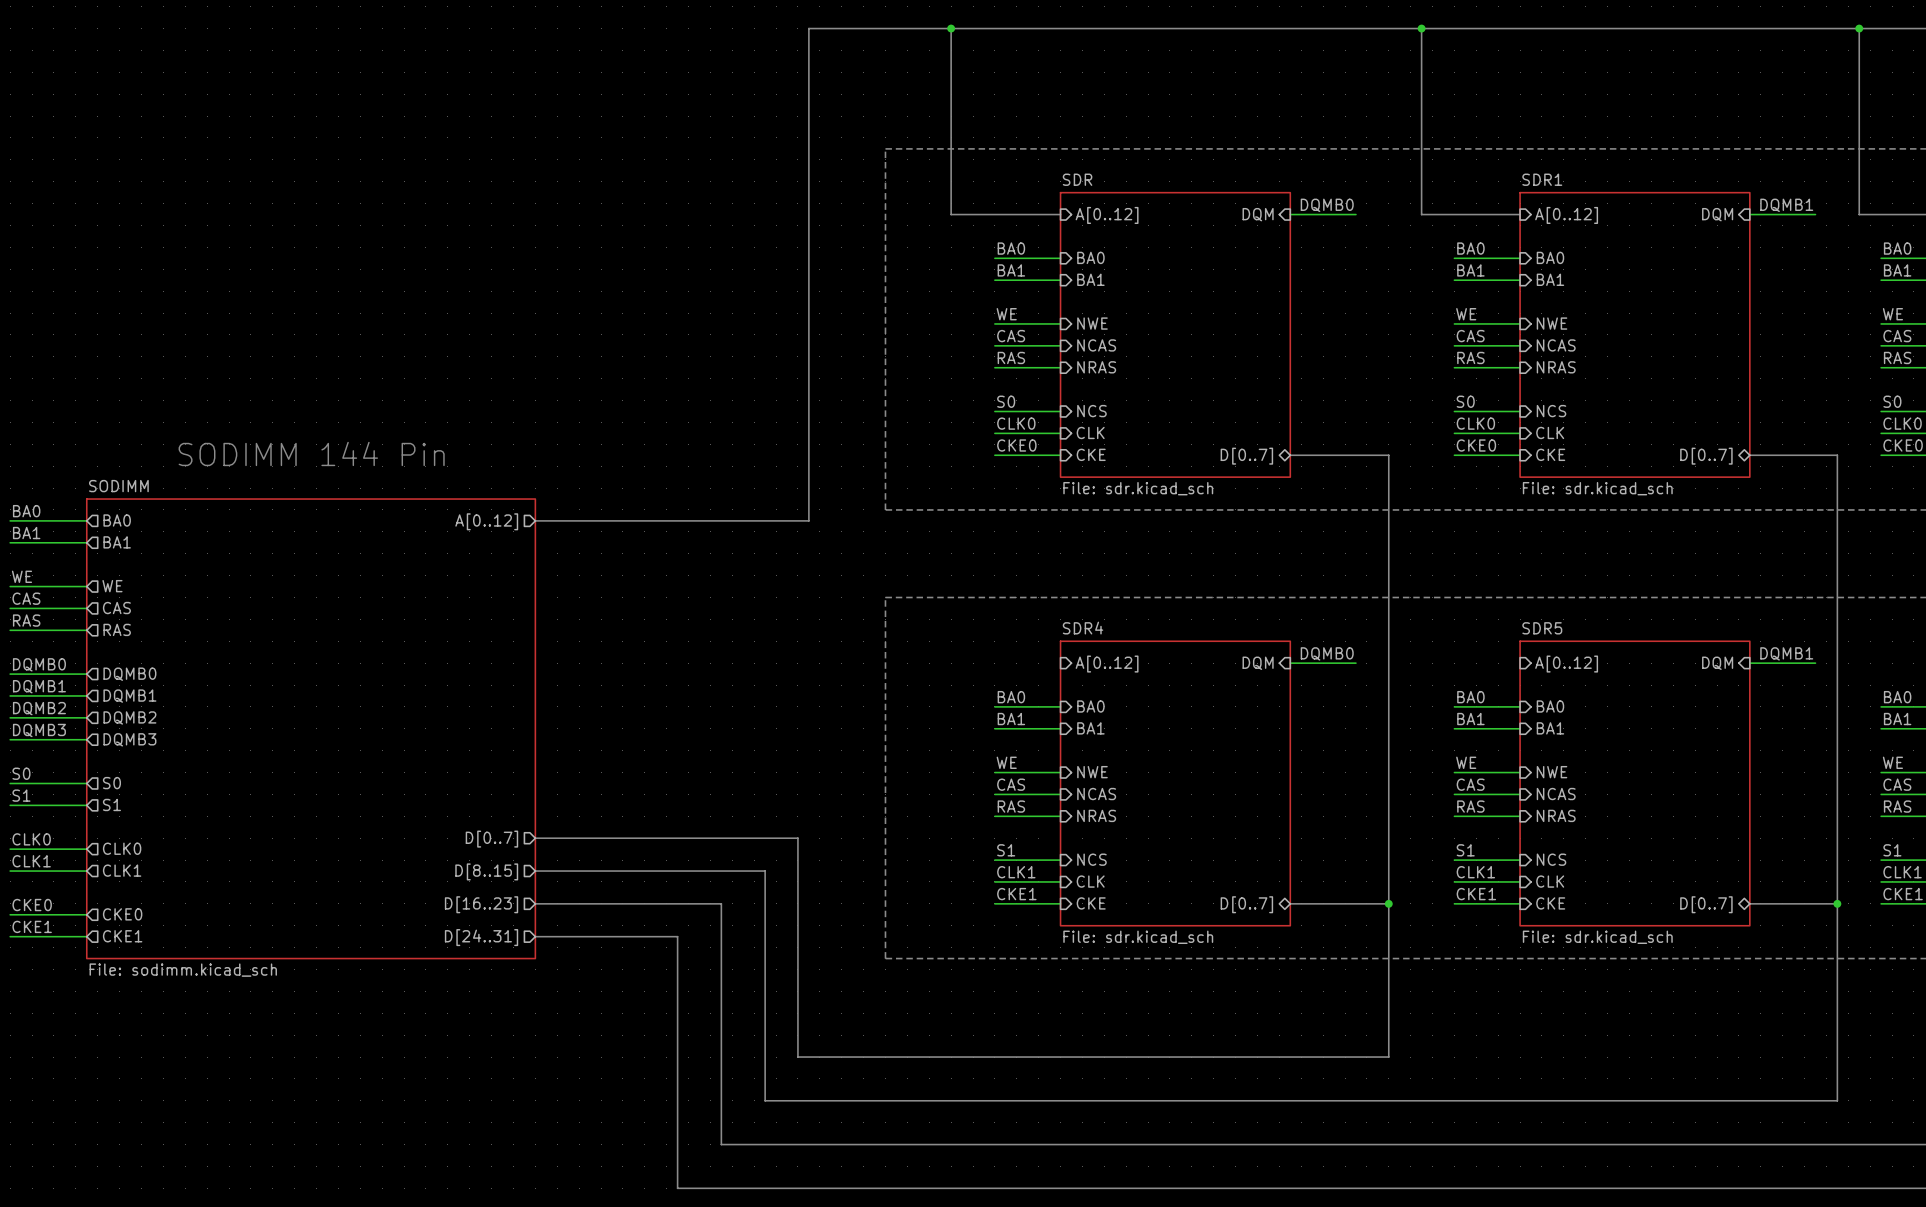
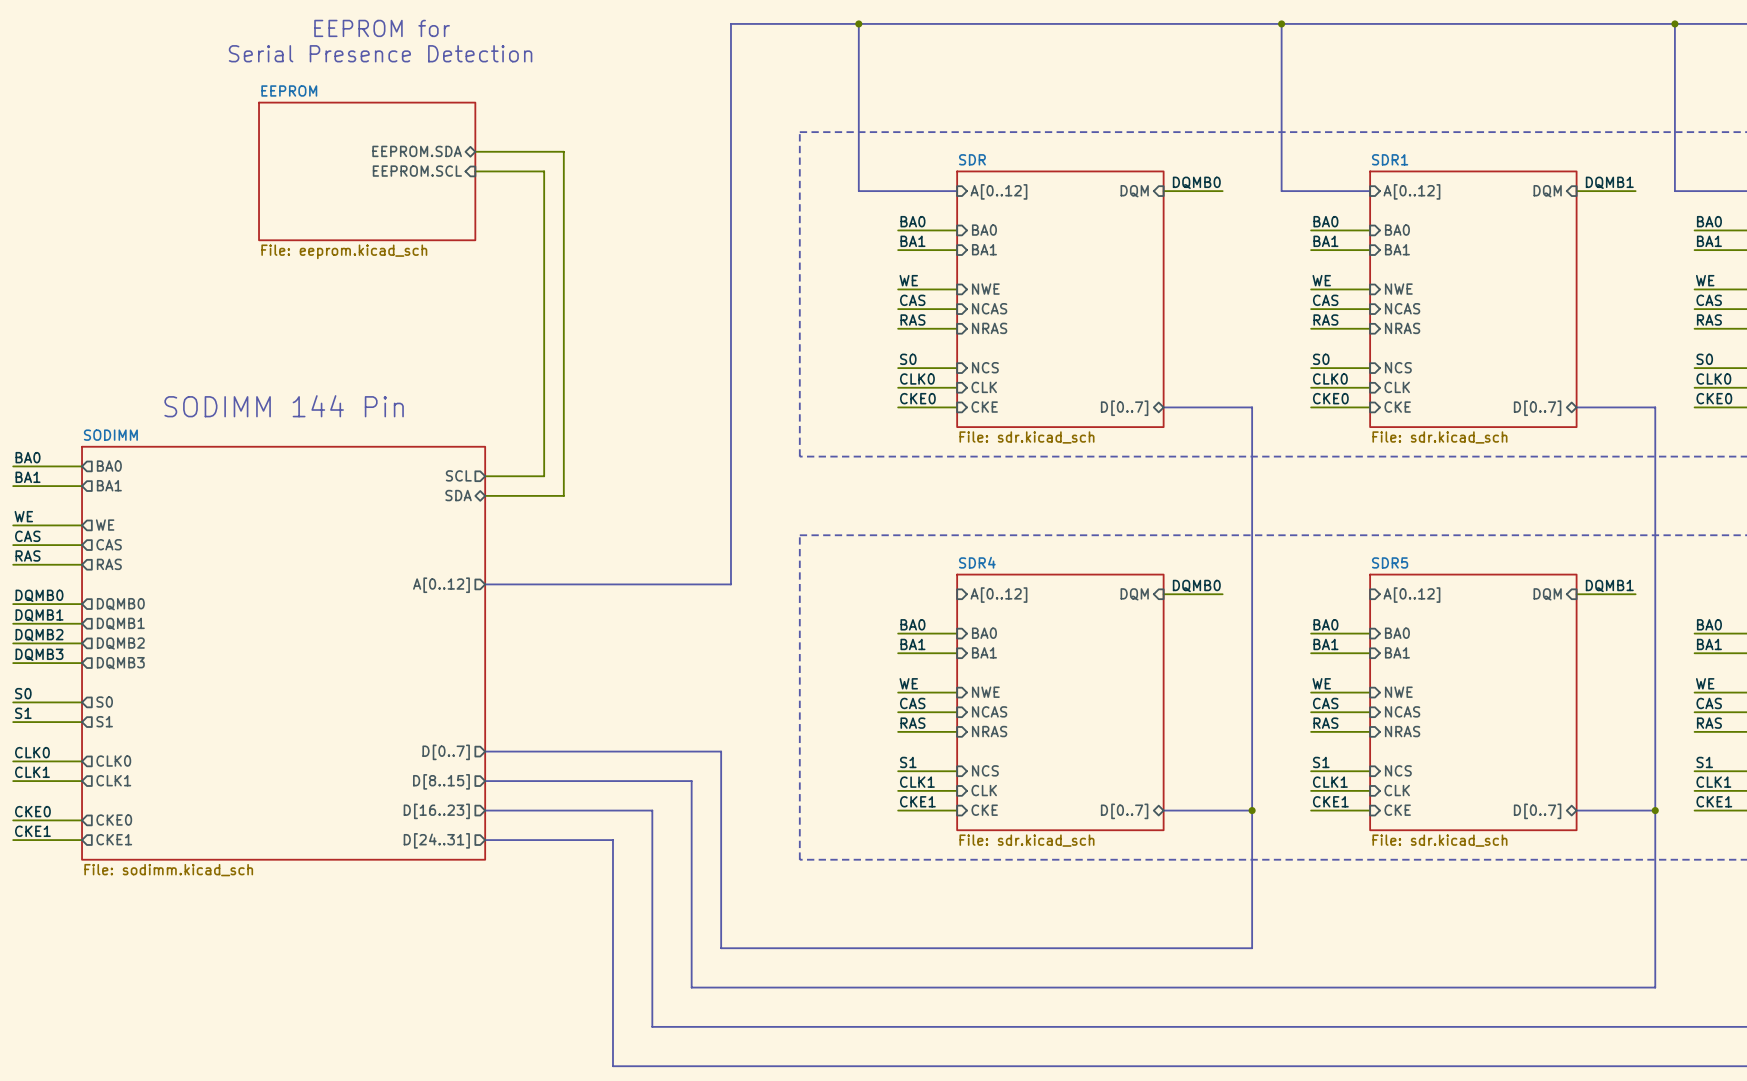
text: none -> EEPROM for (382, 28)
text: none -> Serial Presence Detection (380, 53)
sheet pin: none -> EEPROM.SDA (417, 151)
wire: none -> (475, 151) (563, 151) (563, 495) (485, 495)
sheet EEPROM: none -> File: eeprom.kicad_sch (367, 171)
sheet pin: none -> EEPROM.SCL (417, 171)
wire: none -> (475, 171) (544, 171) (544, 476) (485, 476)
bus: (535, 520) (808, 520) -> (485, 584) (730, 584) (730, 466)
sheet pin position: A[0..12] (486, 521) -> A[0..12] (441, 585)
sheet pin: none -> SCL (458, 475)
sheet pin: none -> SDA (458, 495)

